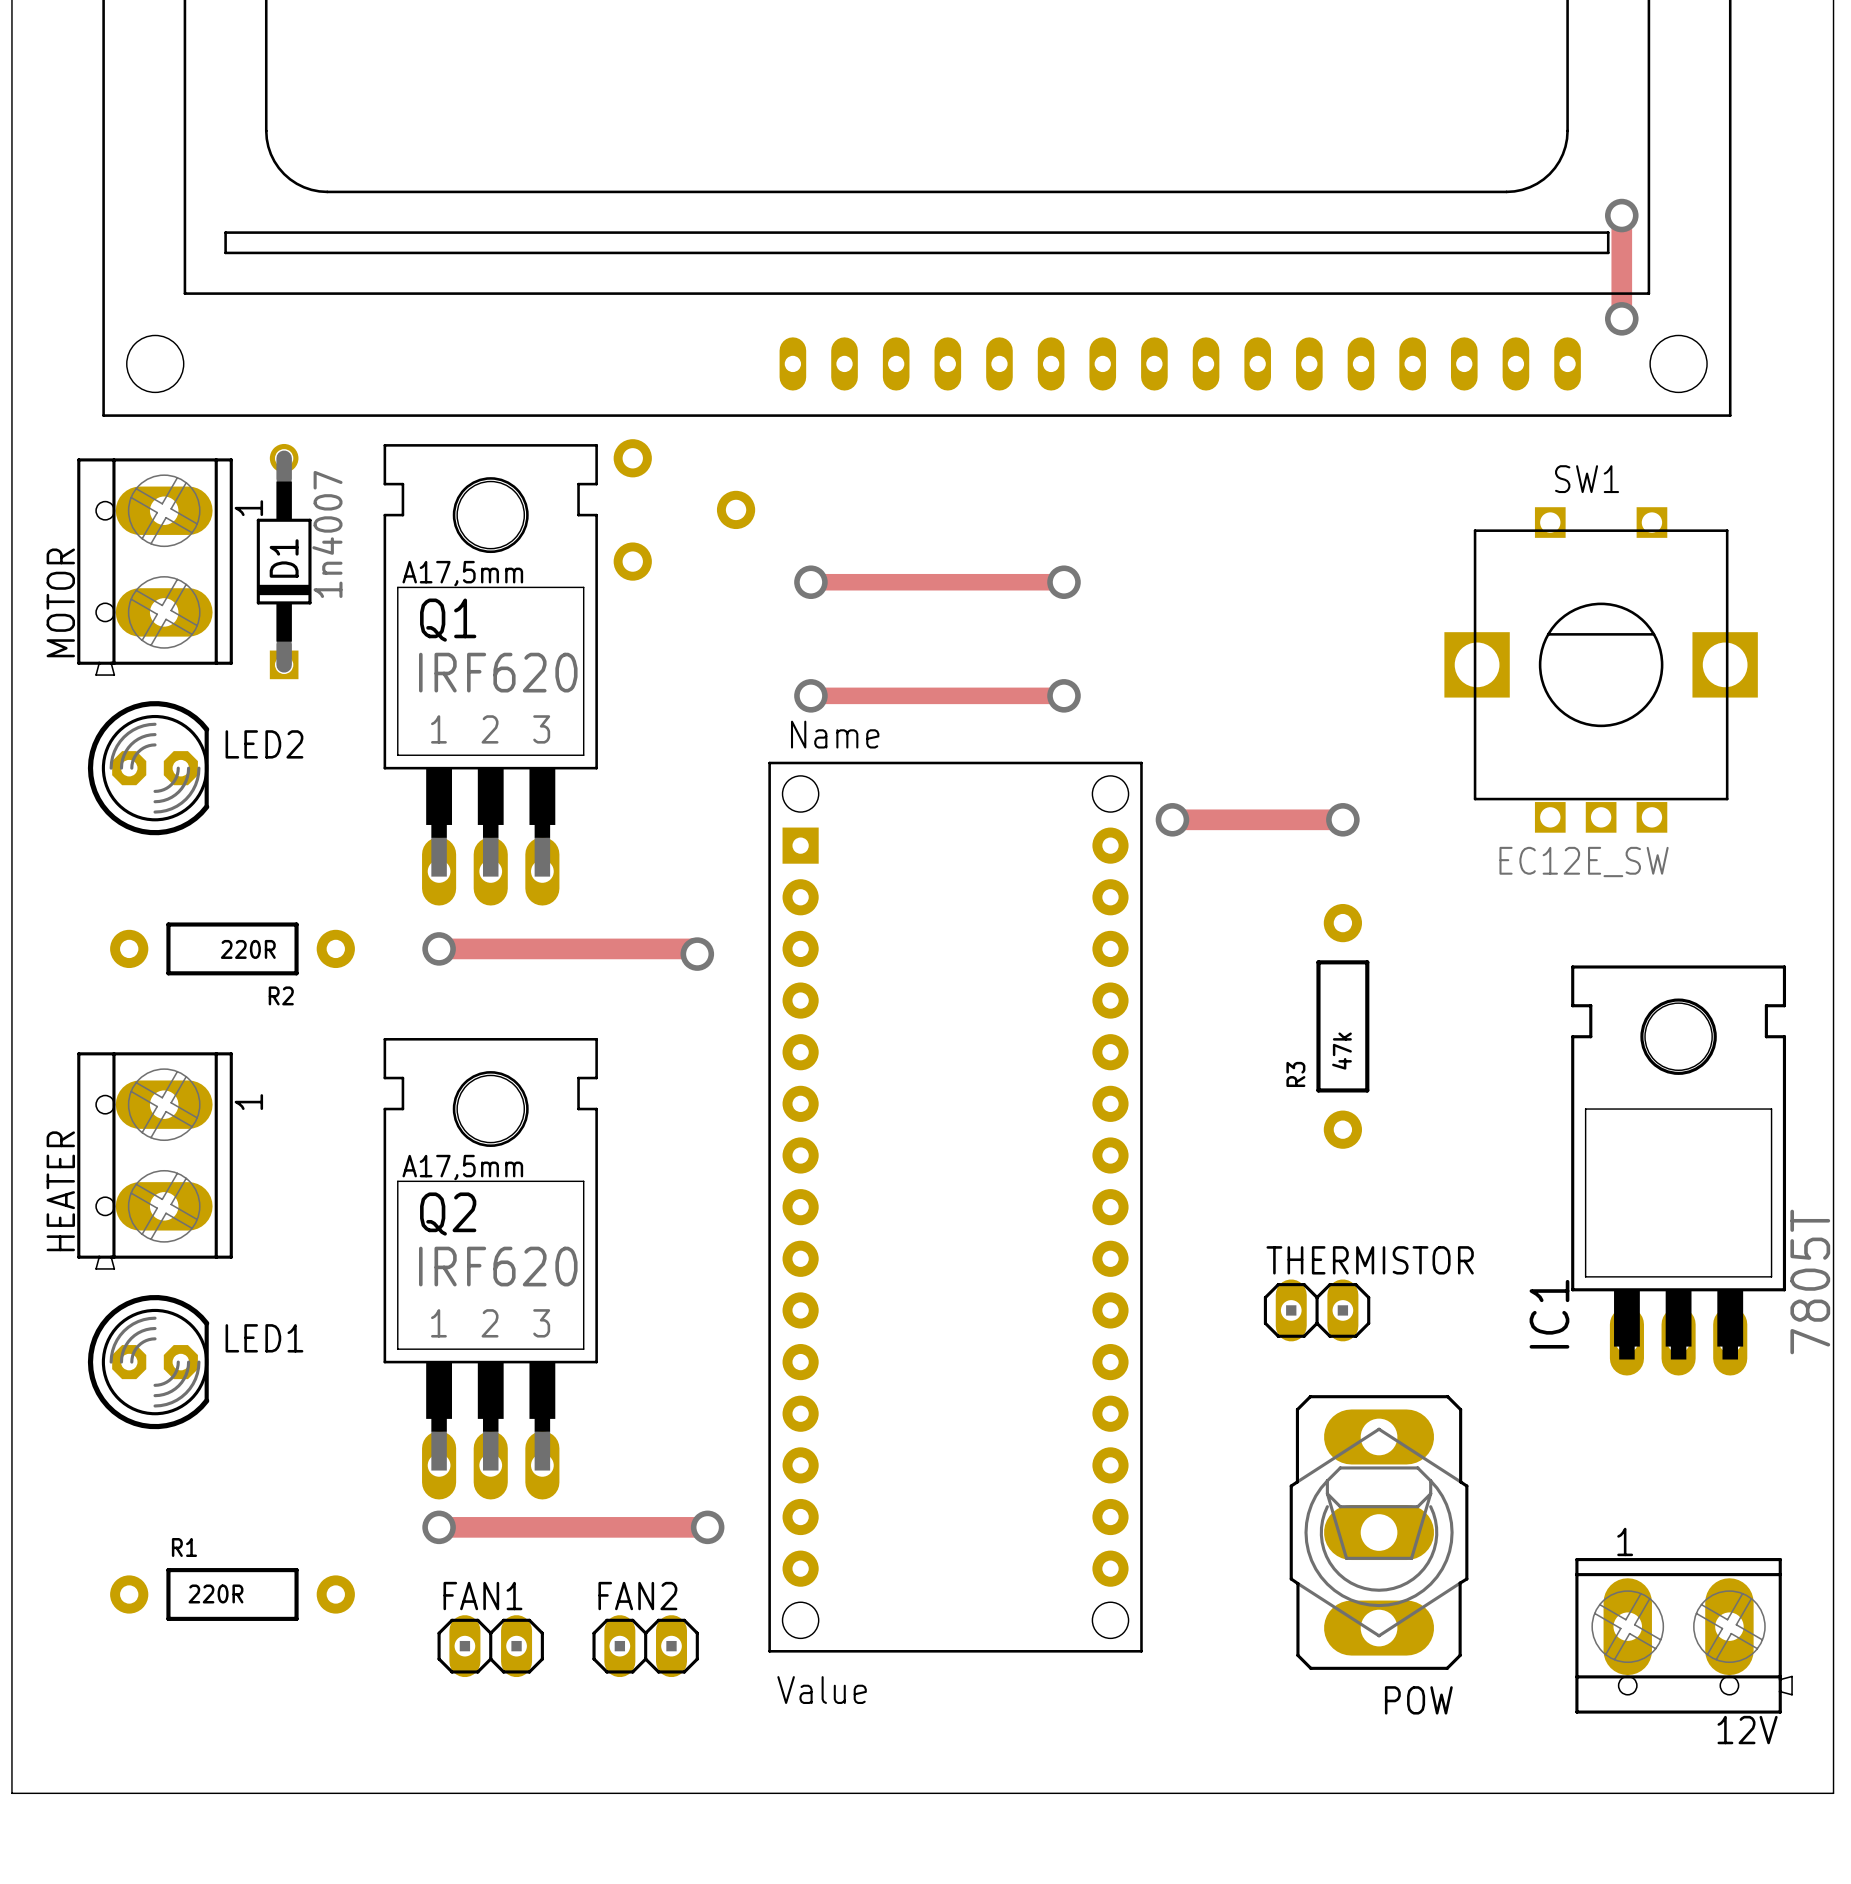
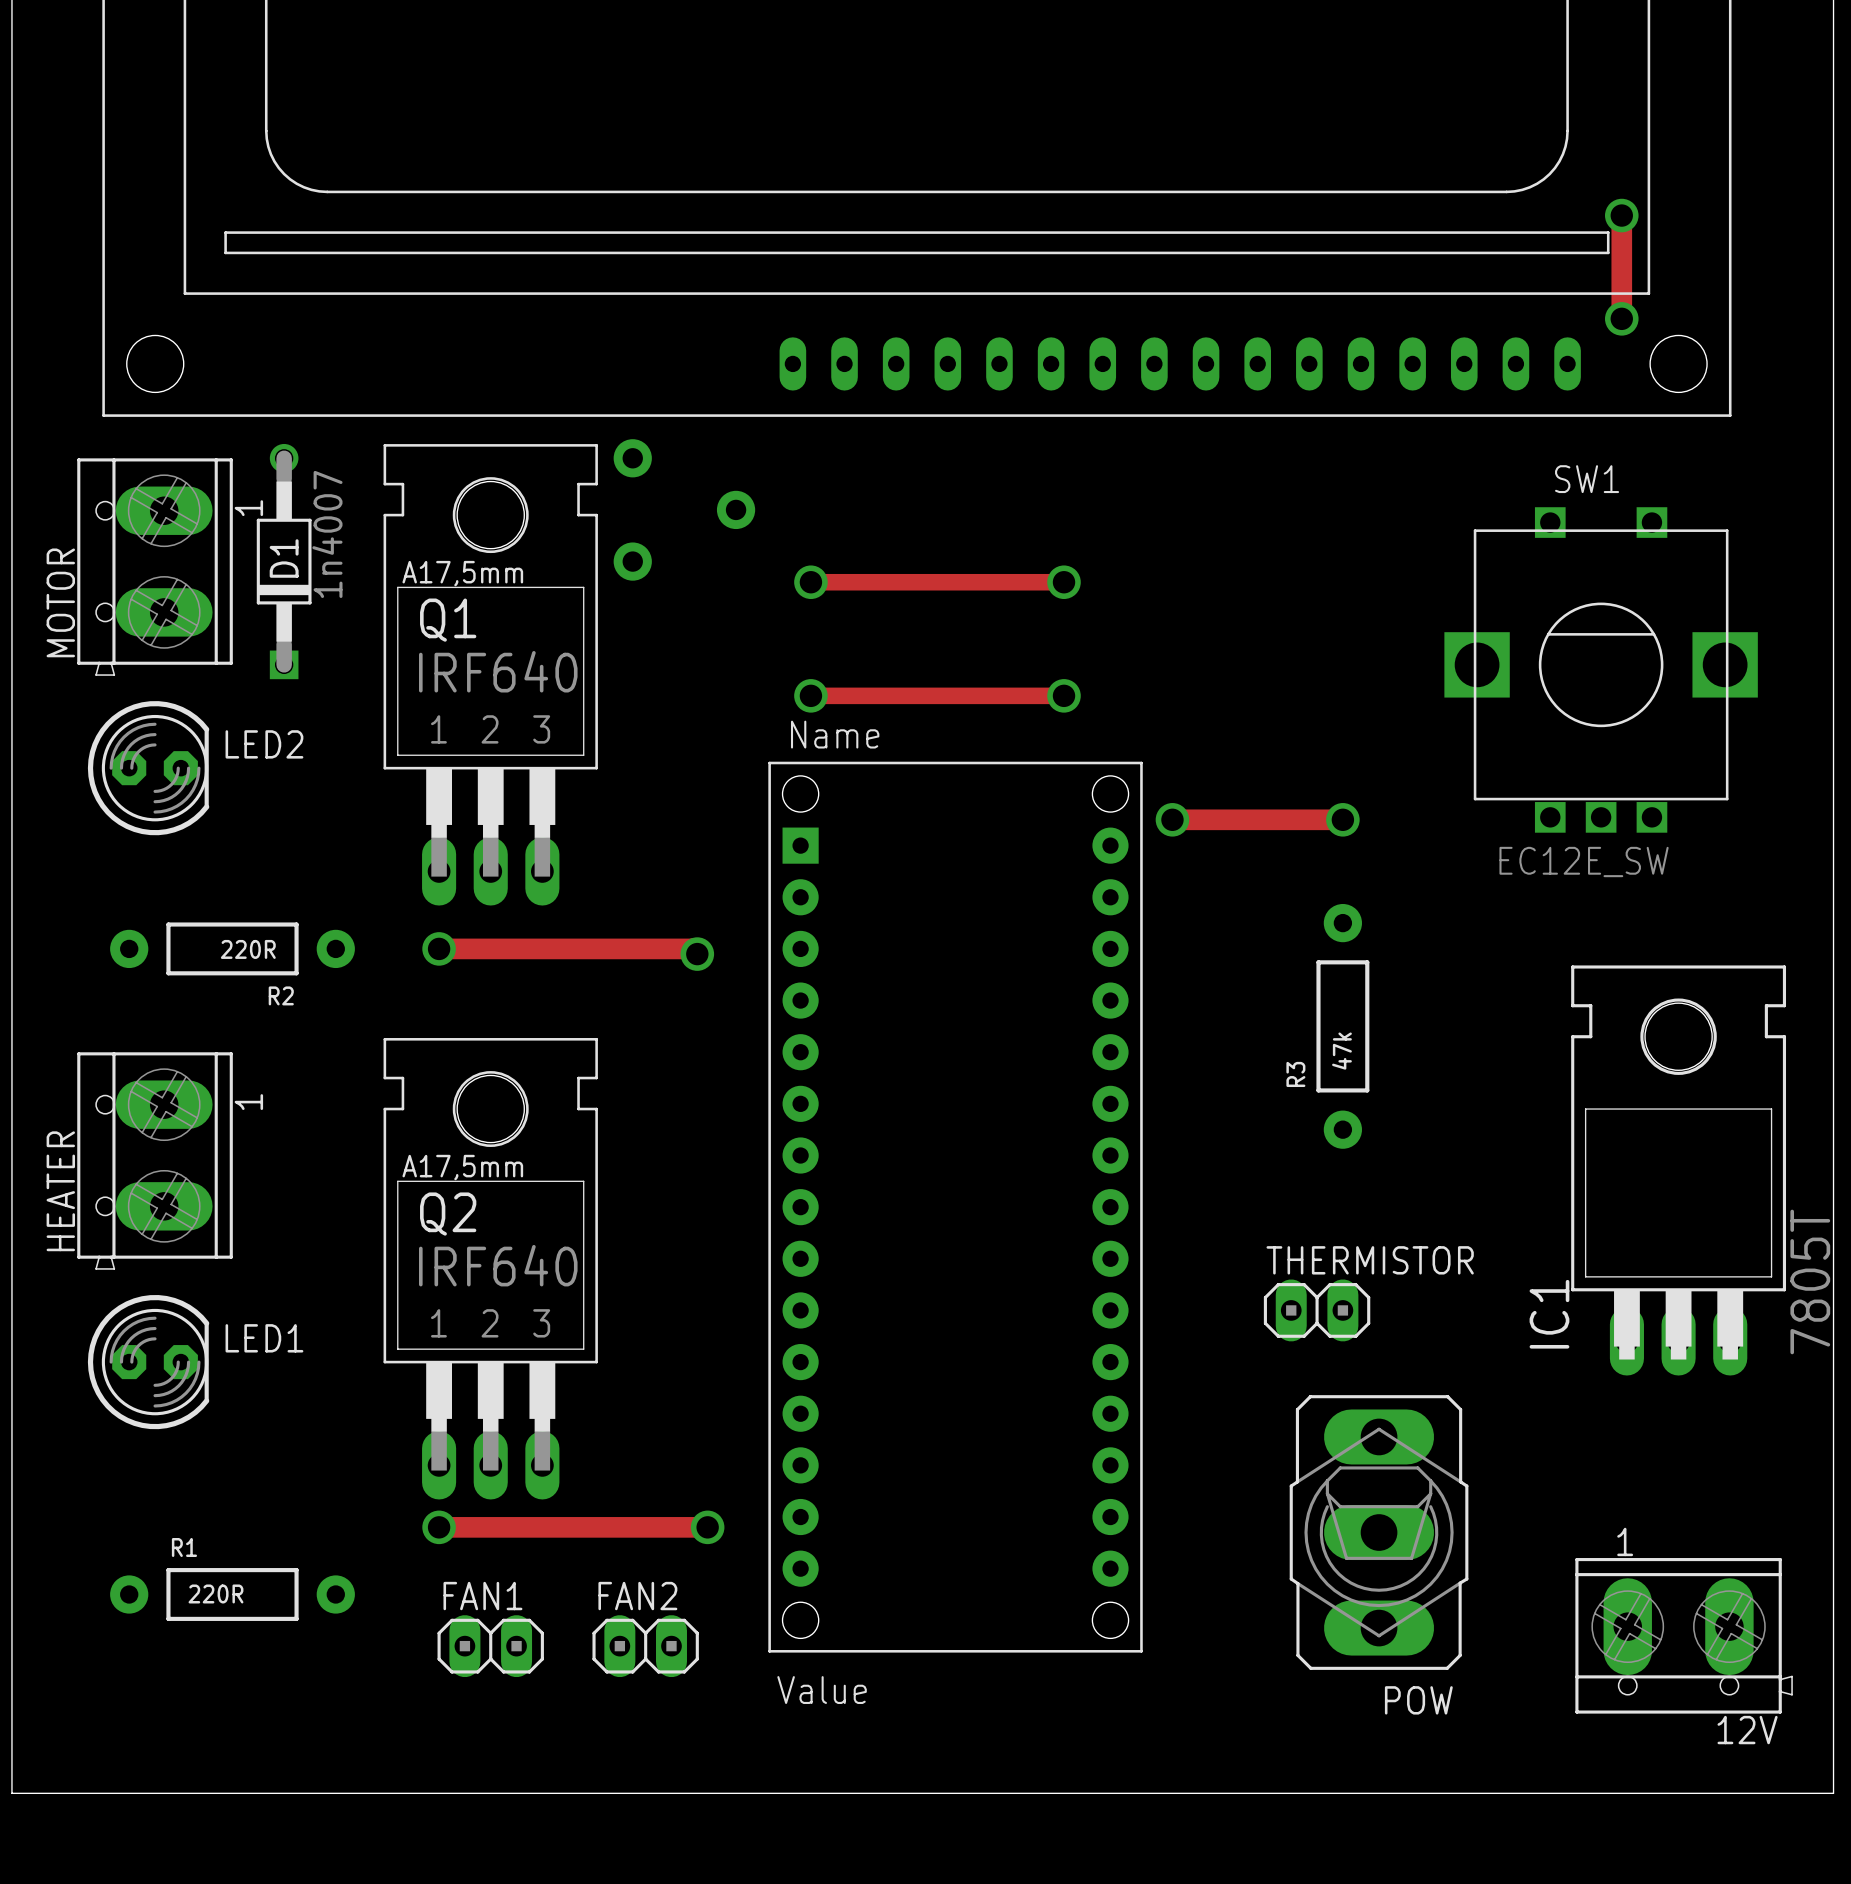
Q1 value: IRF620 (498, 672) -> IRF640 (498, 671)
Q2 value: IRF620 (498, 1266) -> IRF640 (498, 1265)

